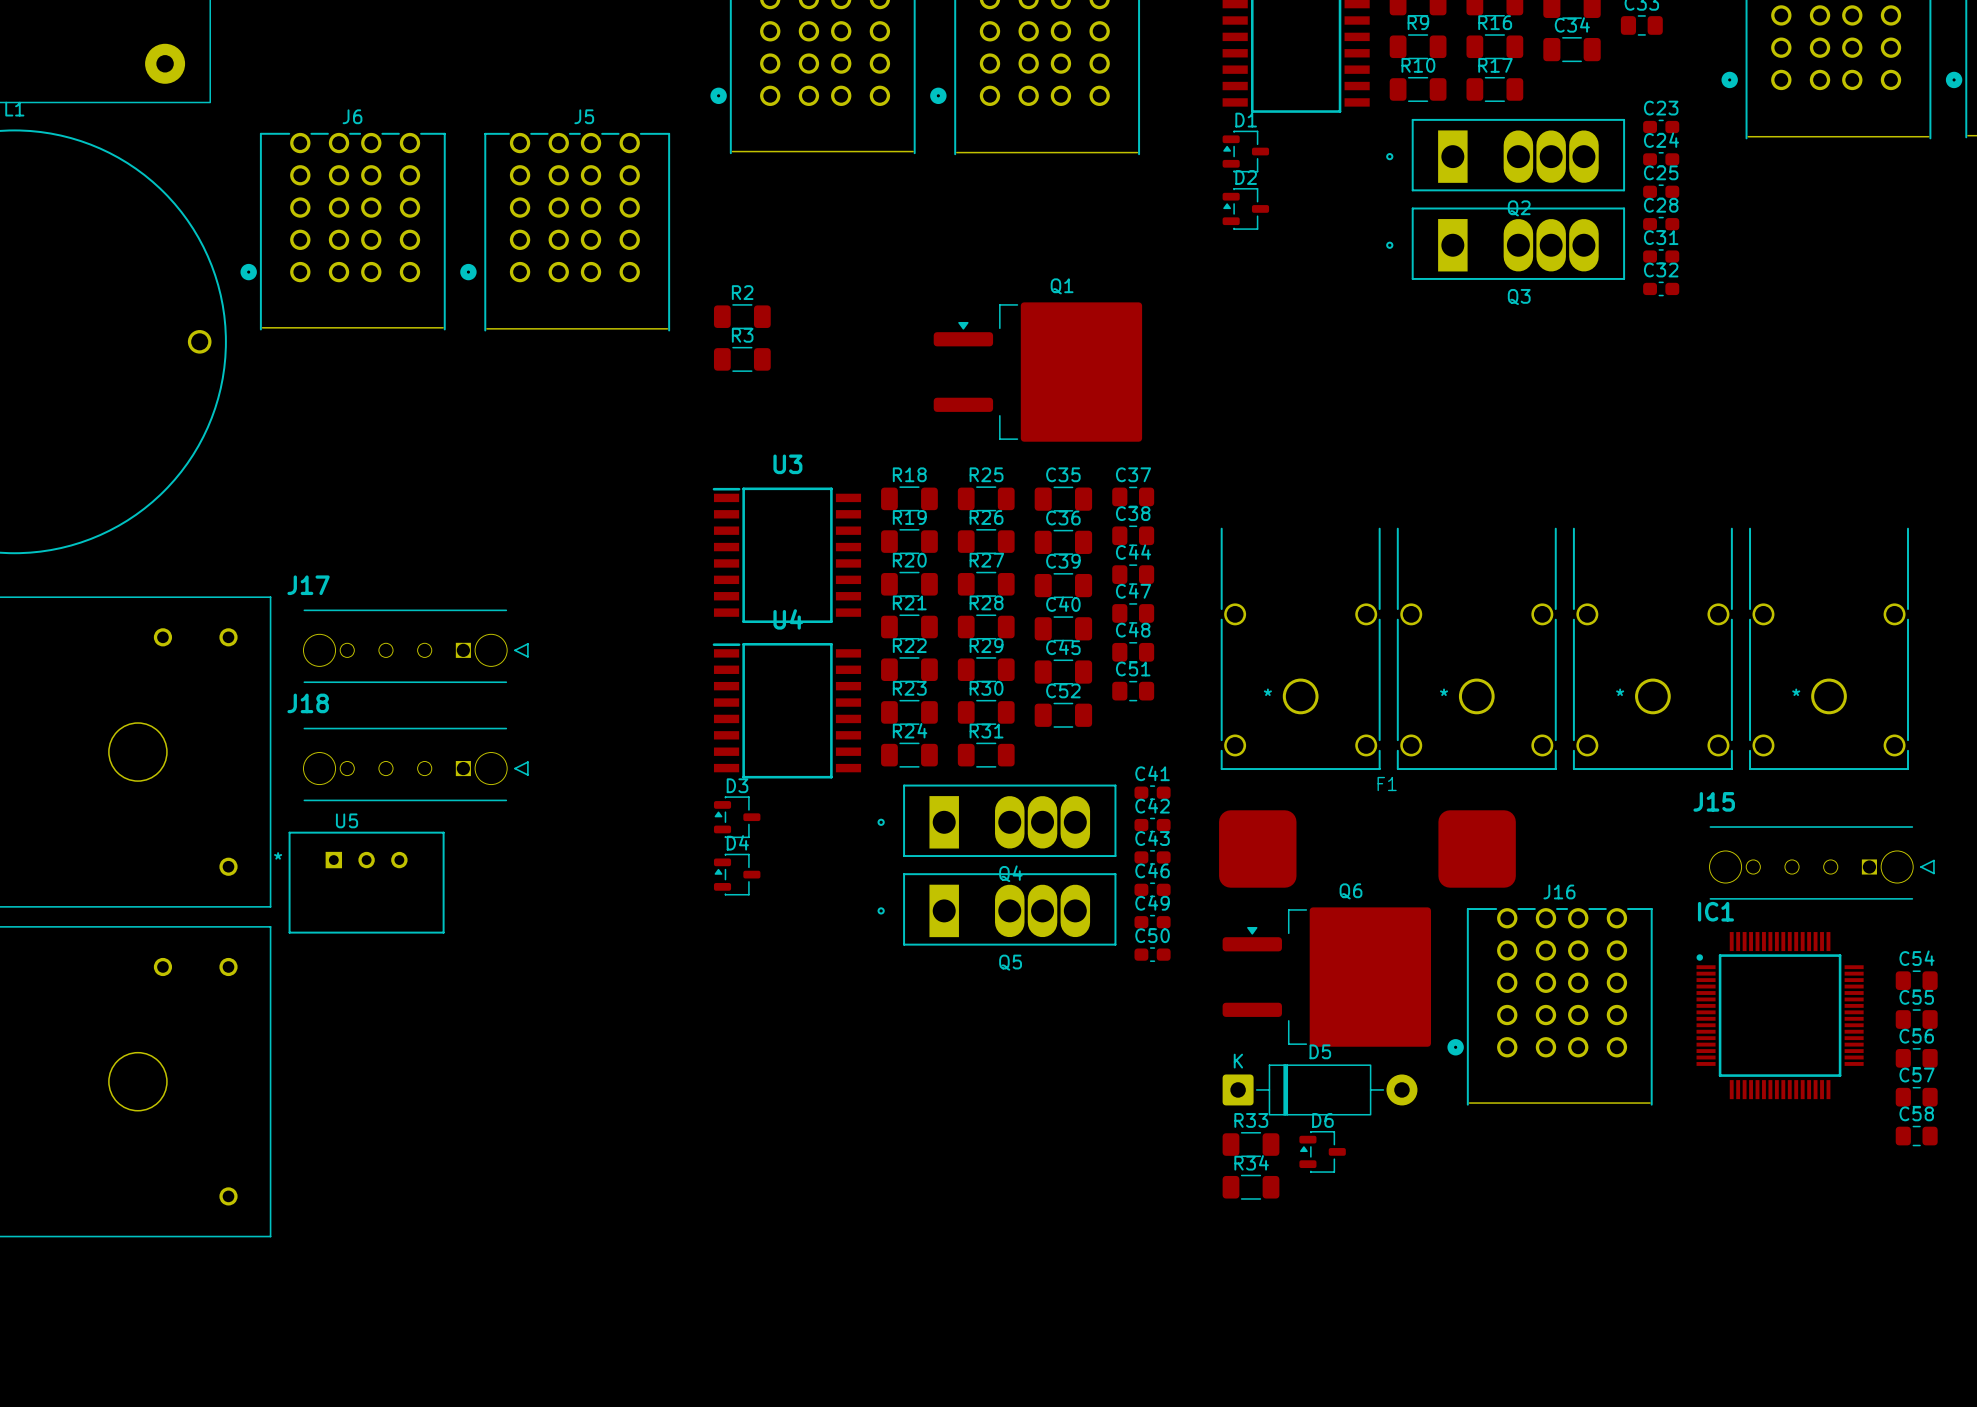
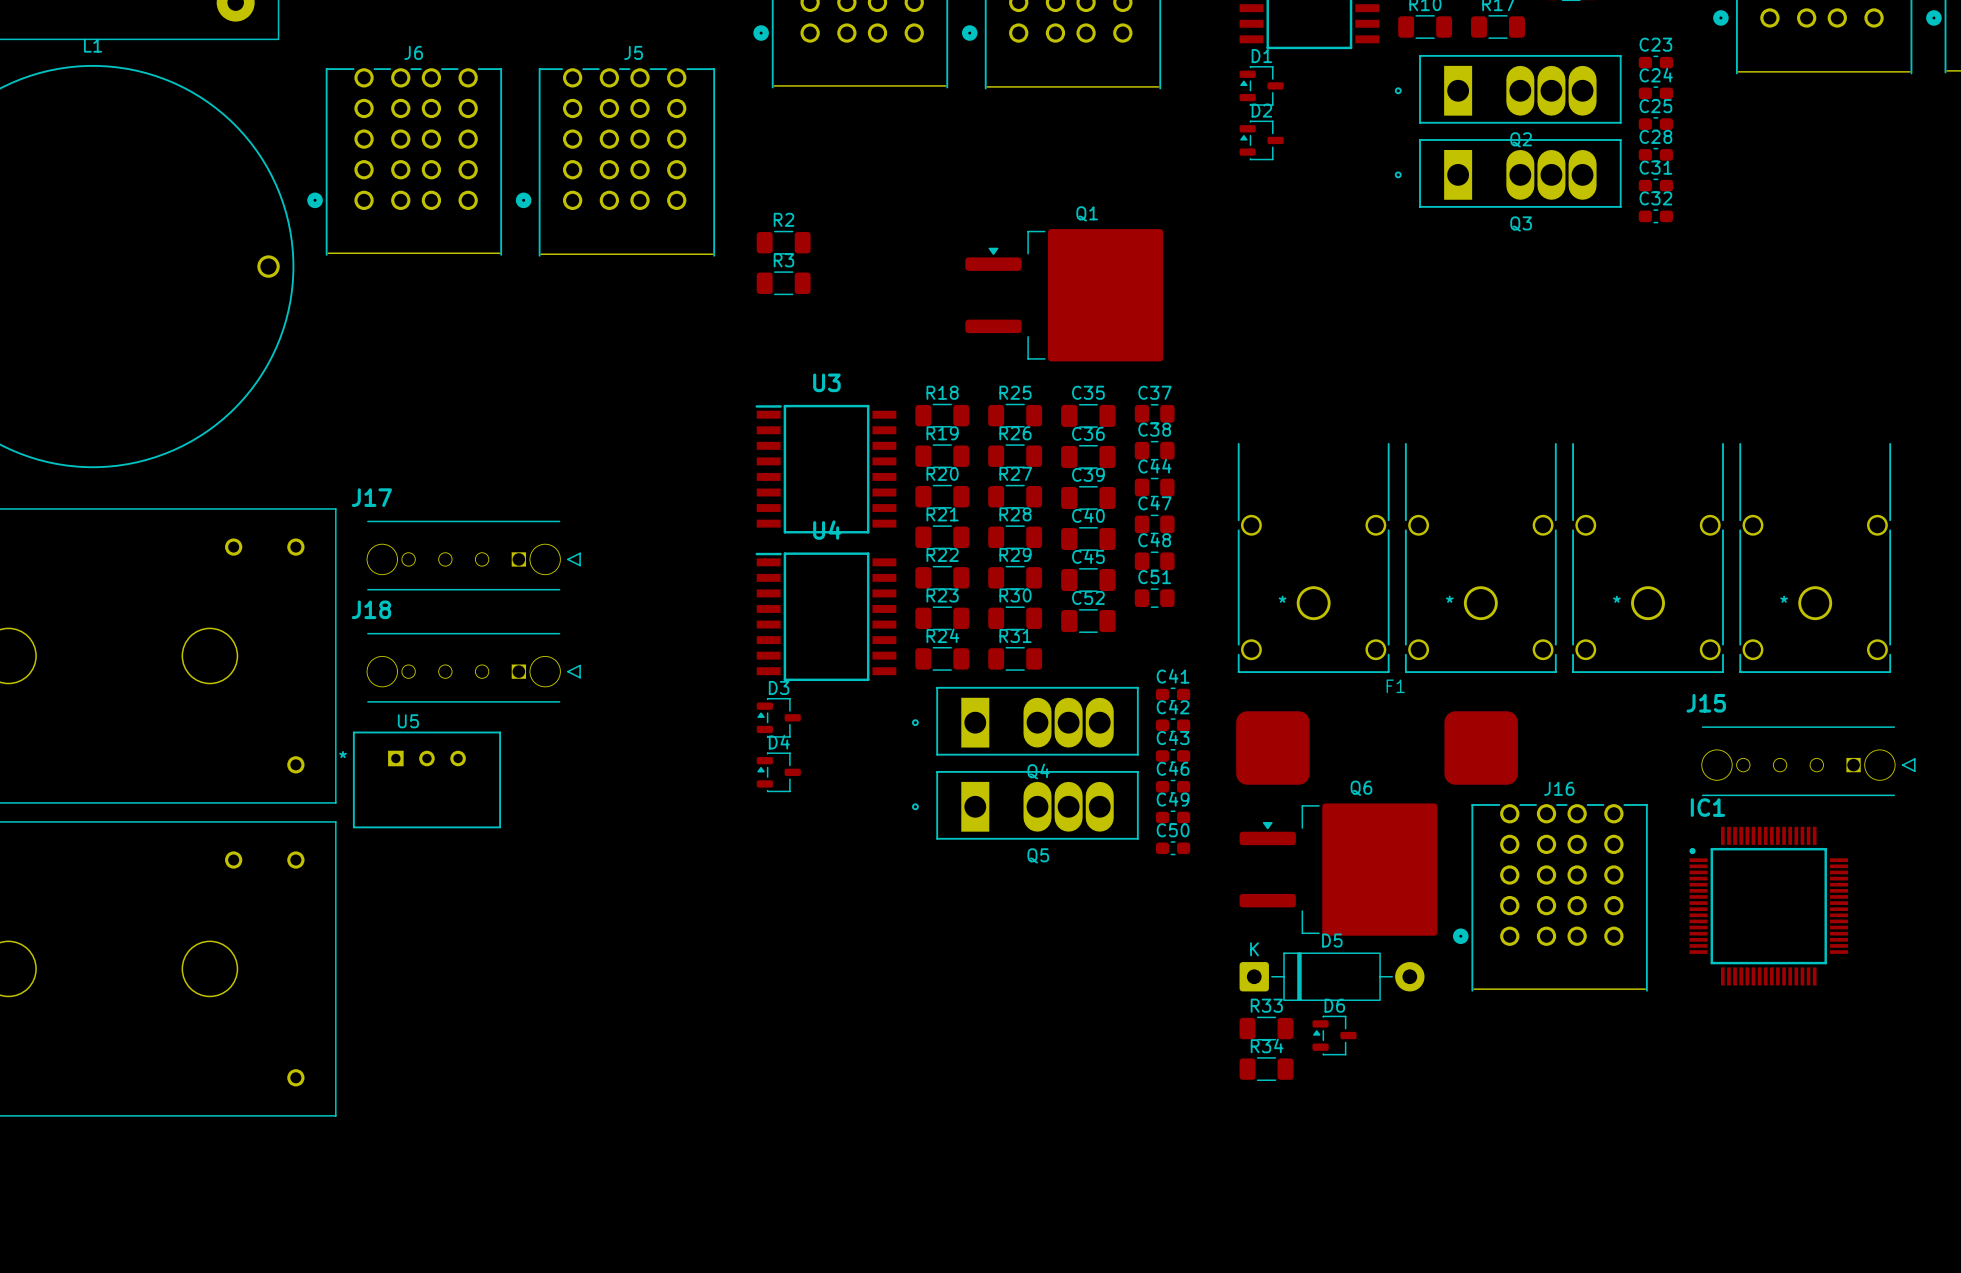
C54: (1916, 980) -> none
C55: (1916, 1019) -> none
C56: (1916, 1058) -> none
C57: (1916, 1097) -> none
C58: (1916, 1136) -> none

